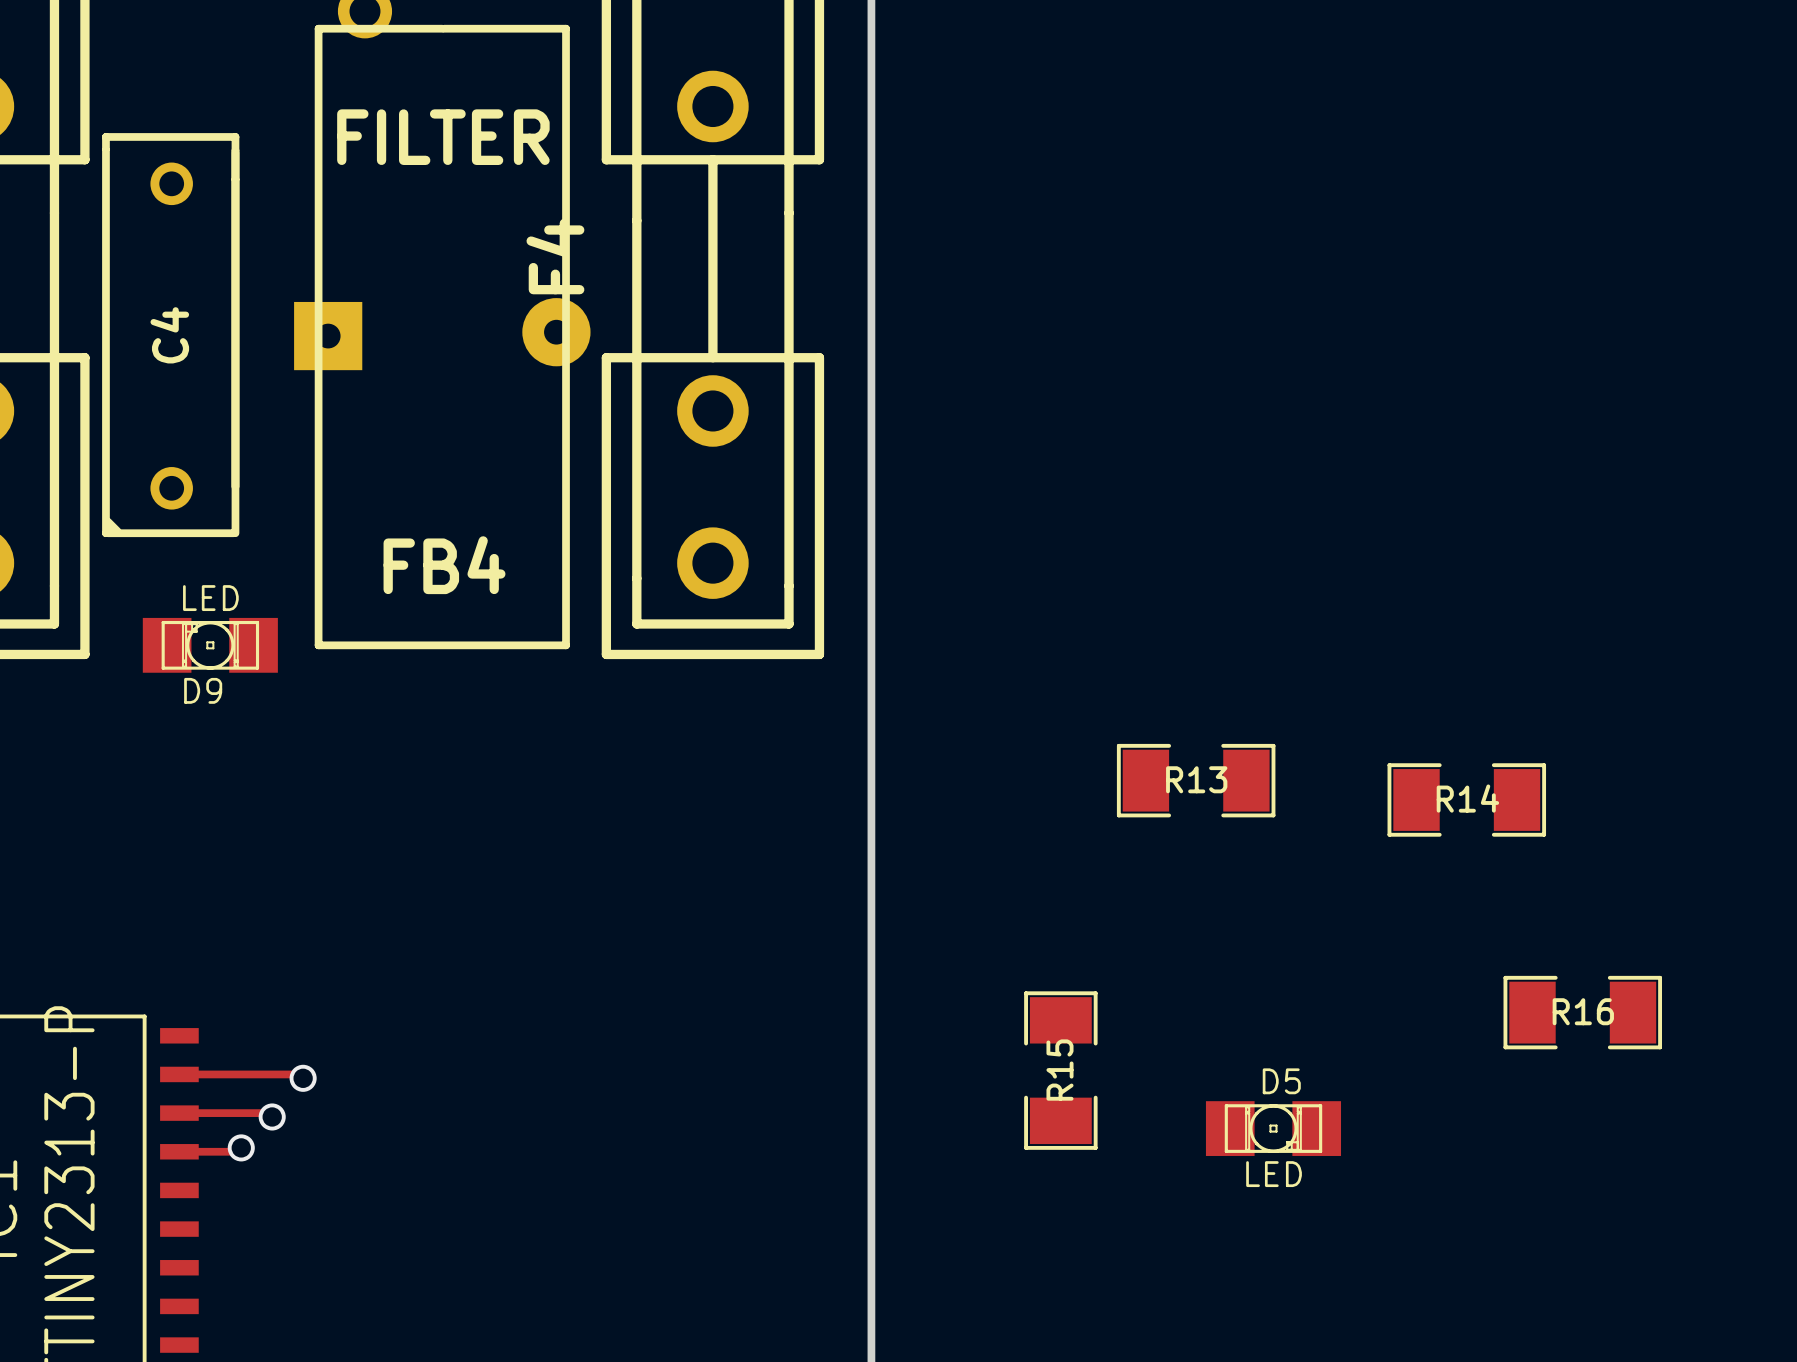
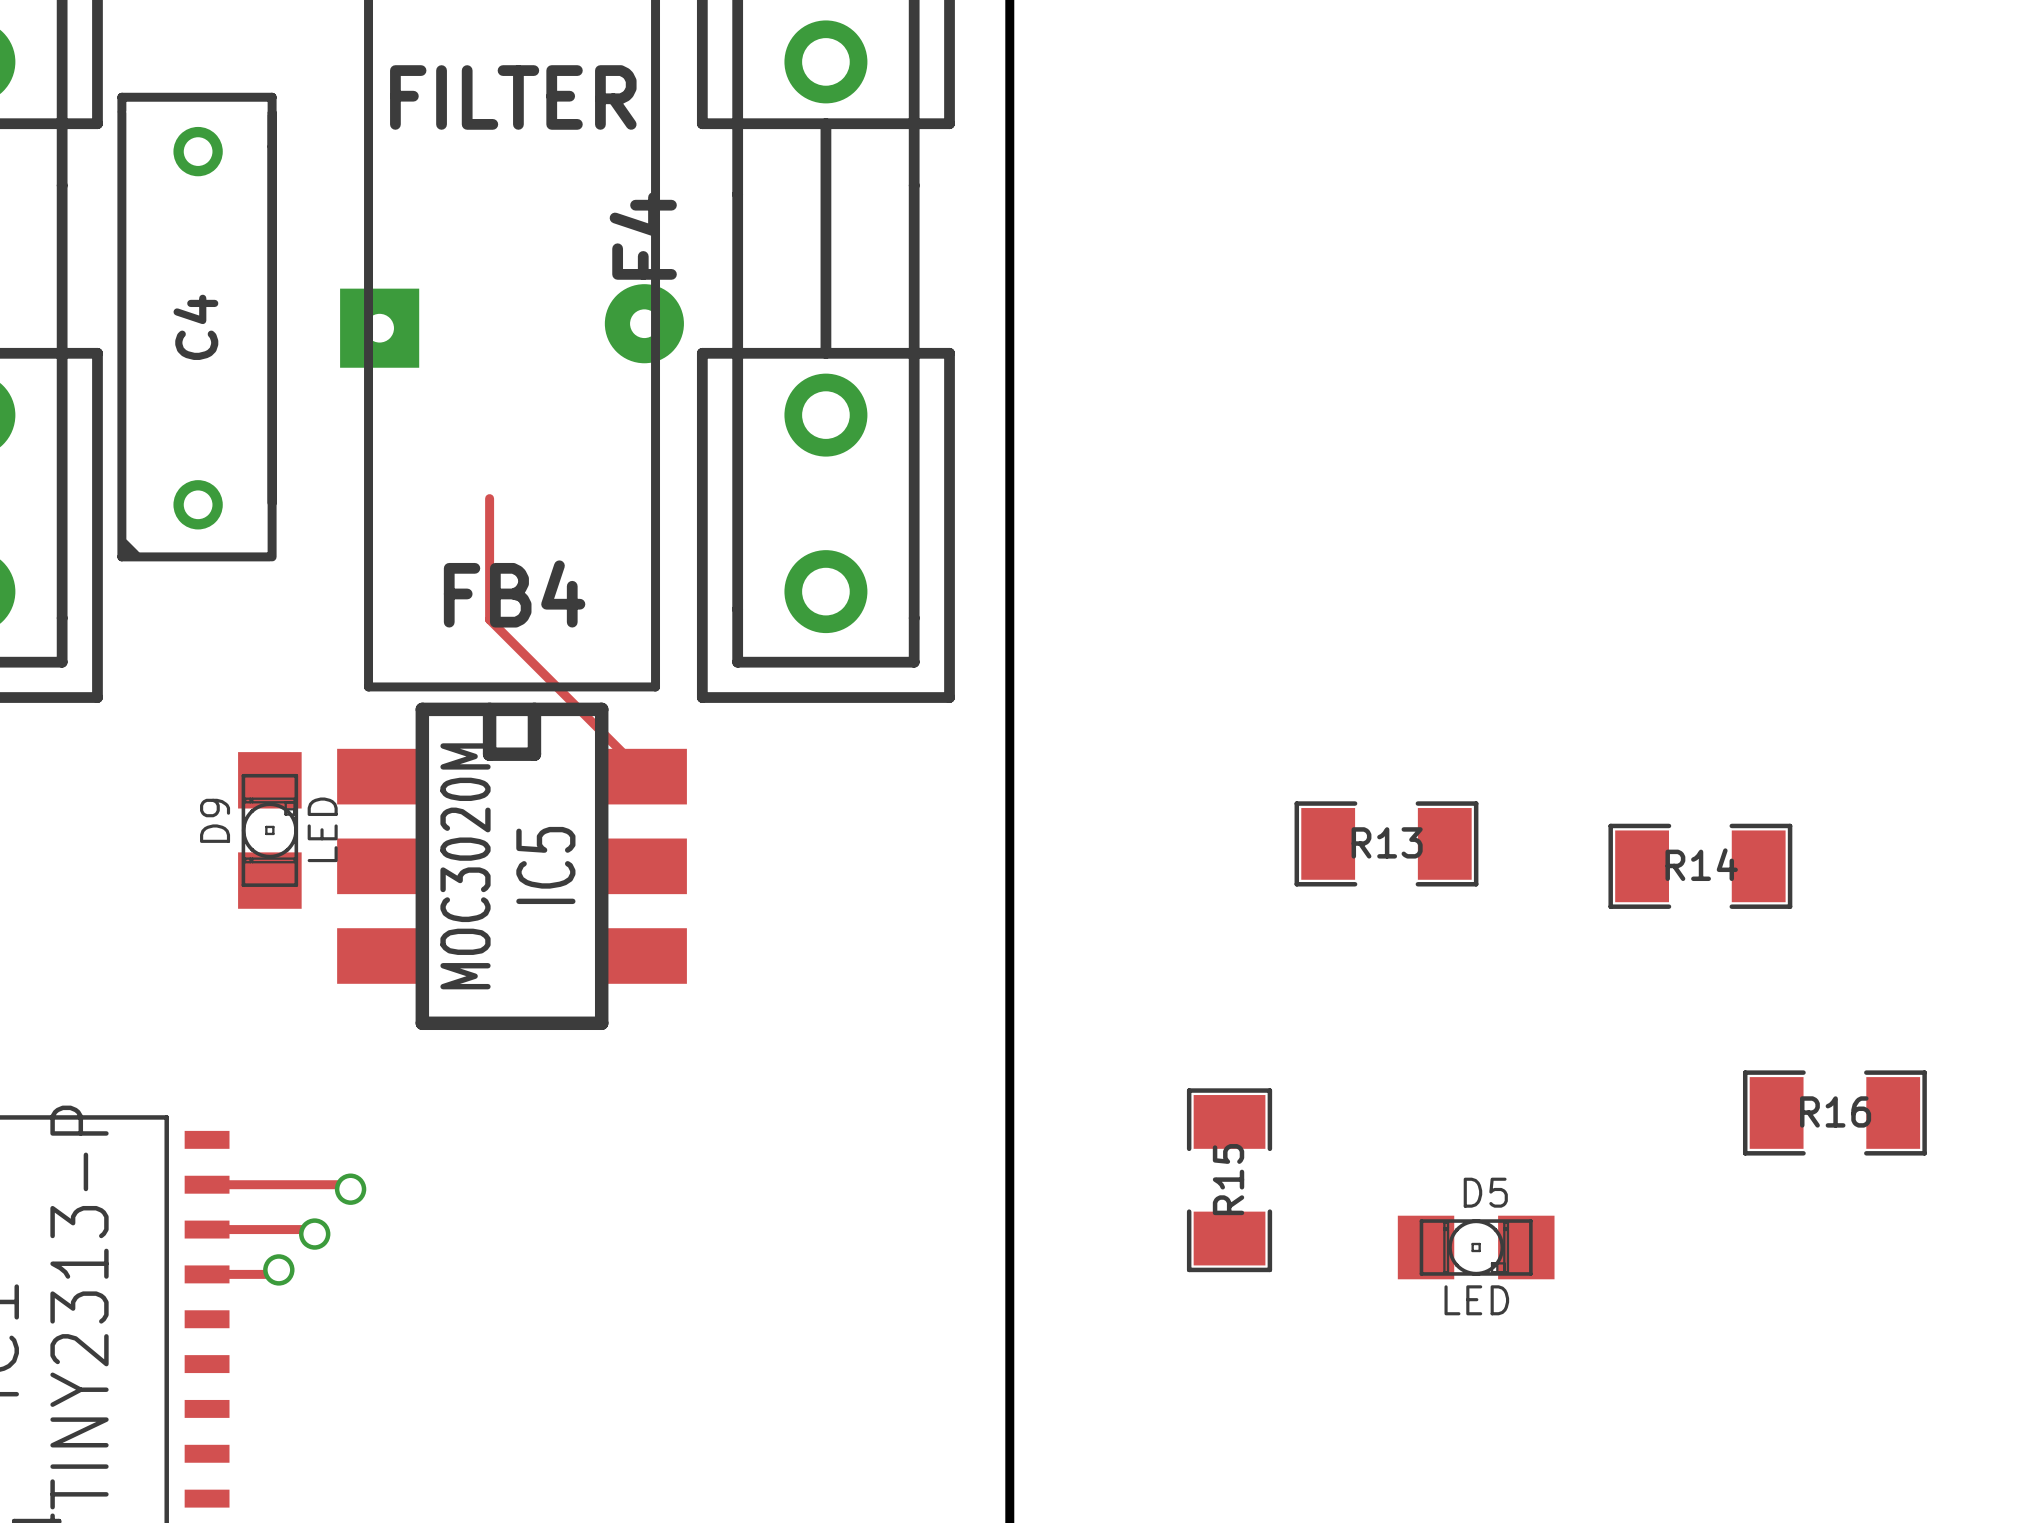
track: none -> (489, 498) (489, 619) (646, 776)
D9 rotation: 0° (210, 645) -> 90° clockwise (269, 830)
D9 position: (210, 645) -> (269, 830)
IC5: none -> MOC3020M (512, 866)

